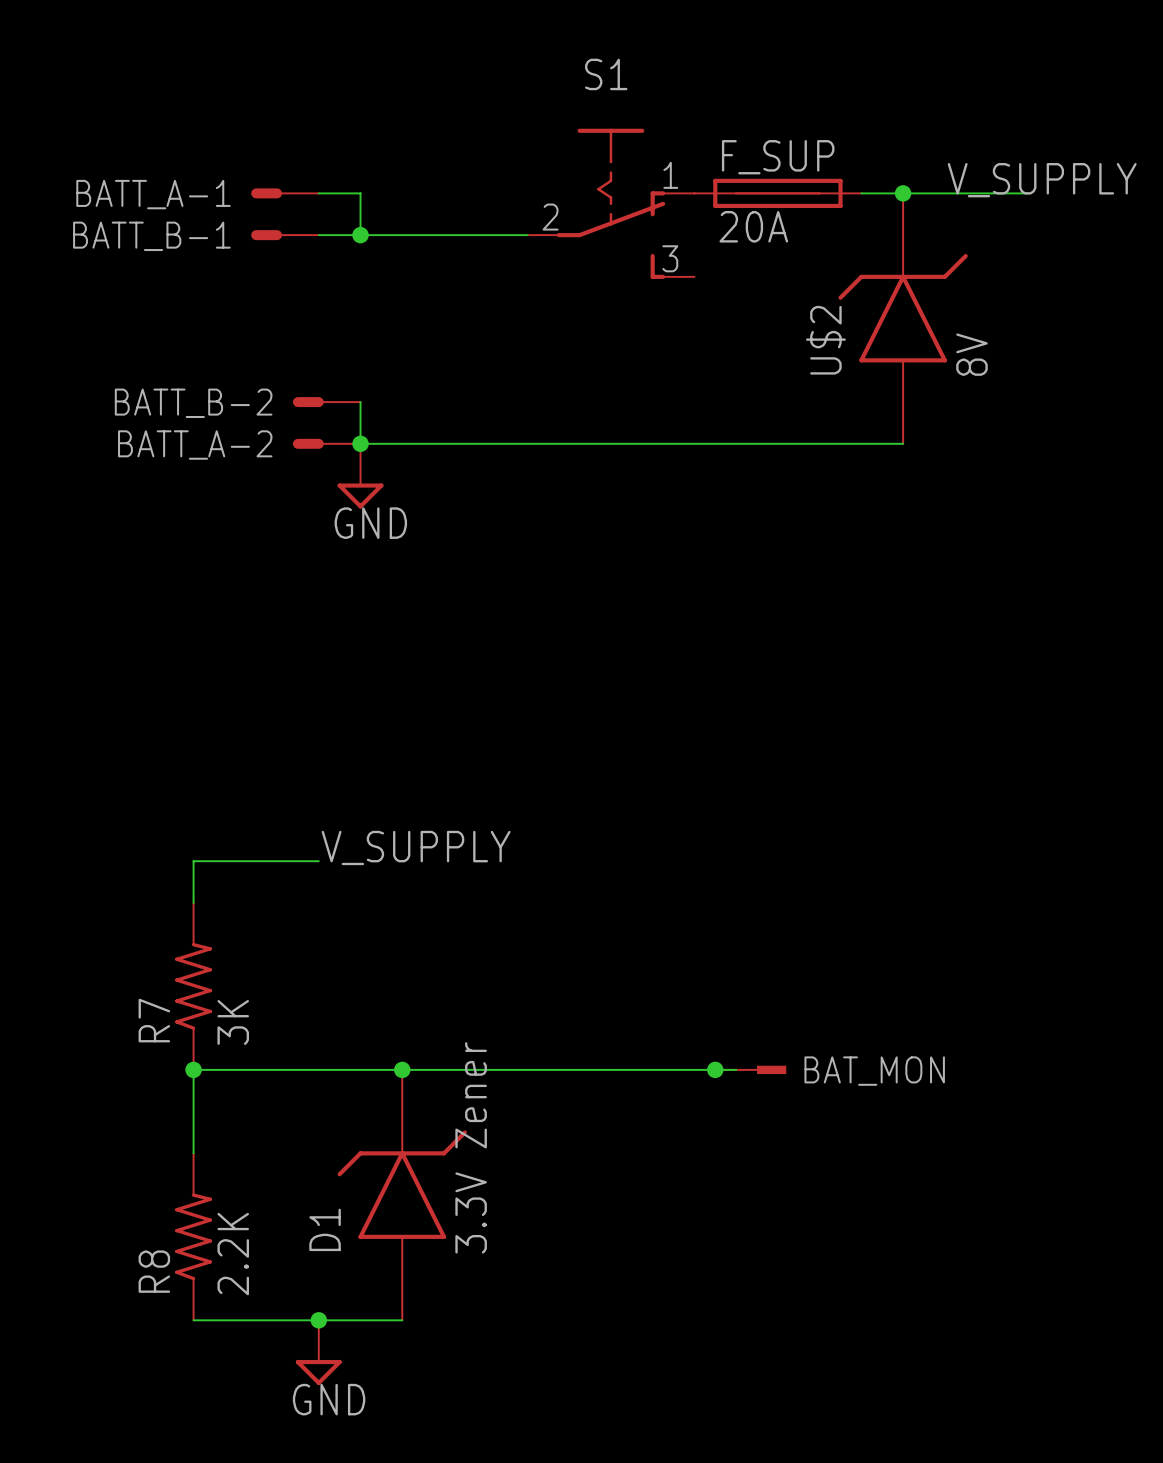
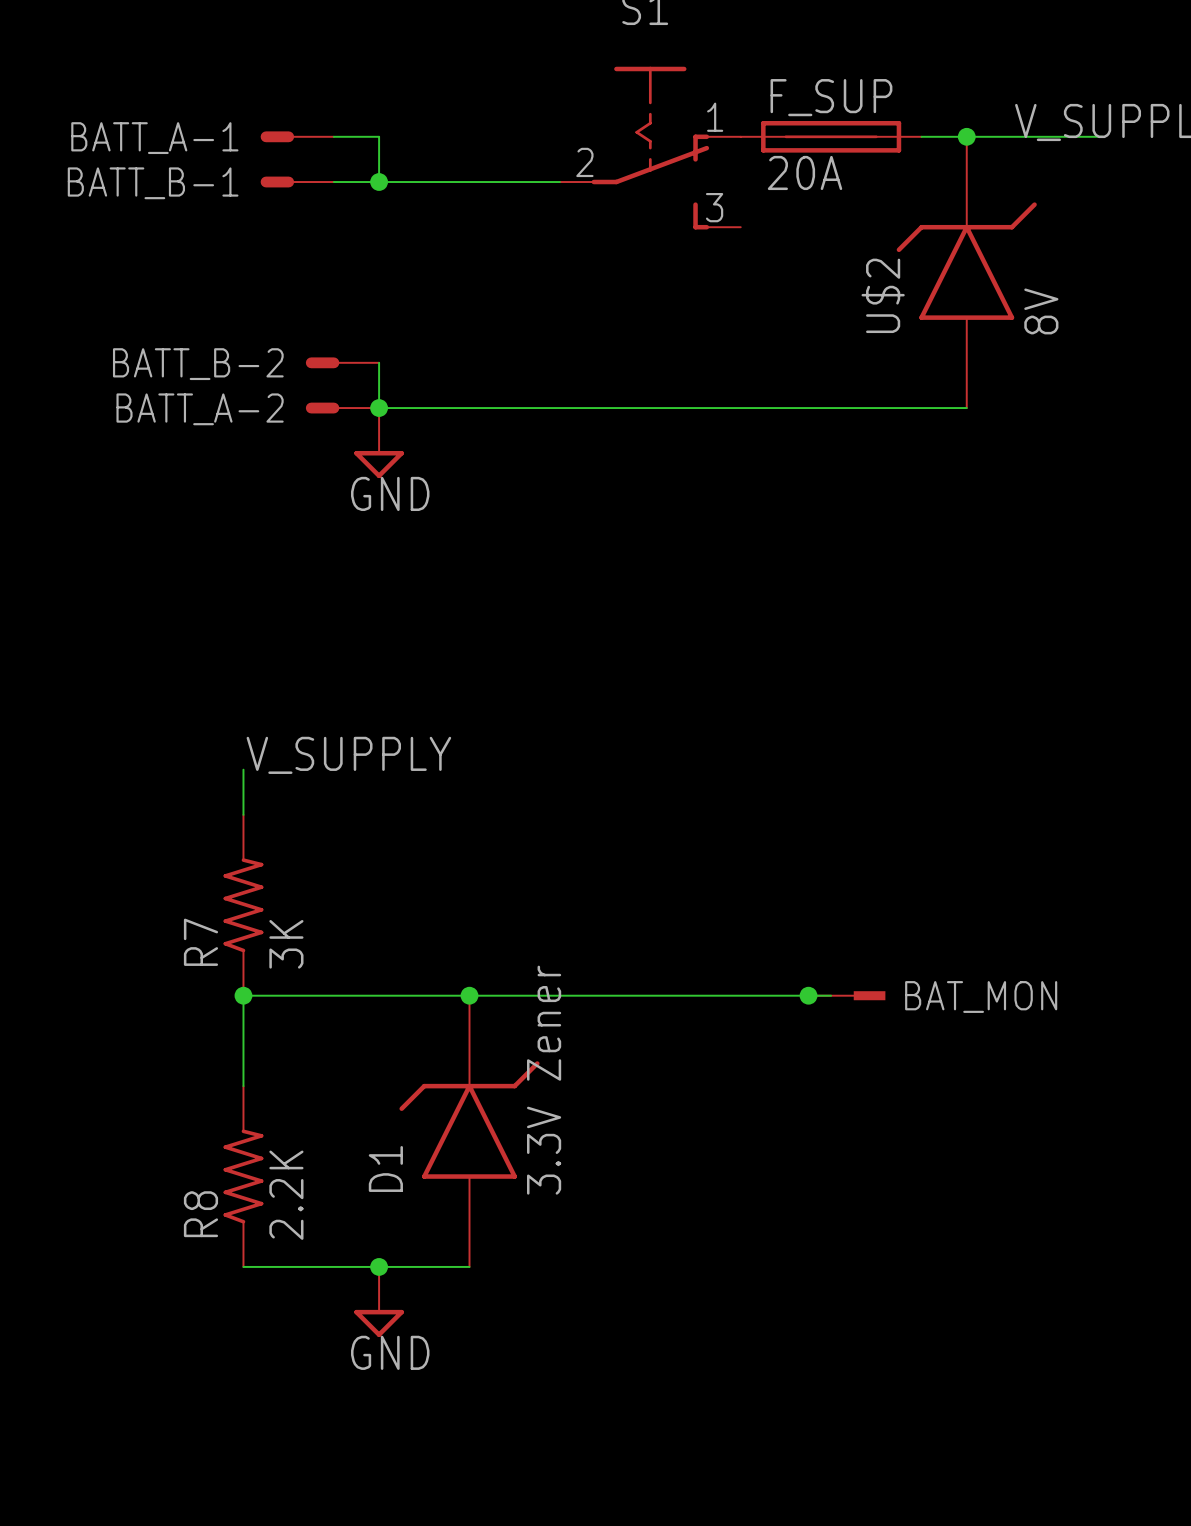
wire: none -> (243, 769) (243, 814)
label position: V_SUPPLY (416, 847) -> V_SUPPLY (348, 755)
wire: (318, 861) (193, 861) (193, 902) -> none
R7 position: (193, 986) -> (243, 905)
junction: none -> (243, 995)
junction: none -> (469, 995)
junction: (193, 1069) -> none
junction: (402, 1069) -> none
junction position: (715, 1069) -> (808, 995)
wire: (736, 1069) (193, 1069) (193, 1153) -> (831, 995) (243, 995) (243, 1086)
BAT_MON position: (750, 1069) -> (846, 995)
D1 position: (402, 1195) -> (469, 1131)
R8 position: (193, 1236) -> (243, 1176)
junction: none -> (379, 1266)
wire: (193, 1320) (402, 1320) -> (243, 1266) (469, 1266)
junction: (318, 1320) -> none
power symbol position: GND (318, 1352) -> GND (379, 1301)

